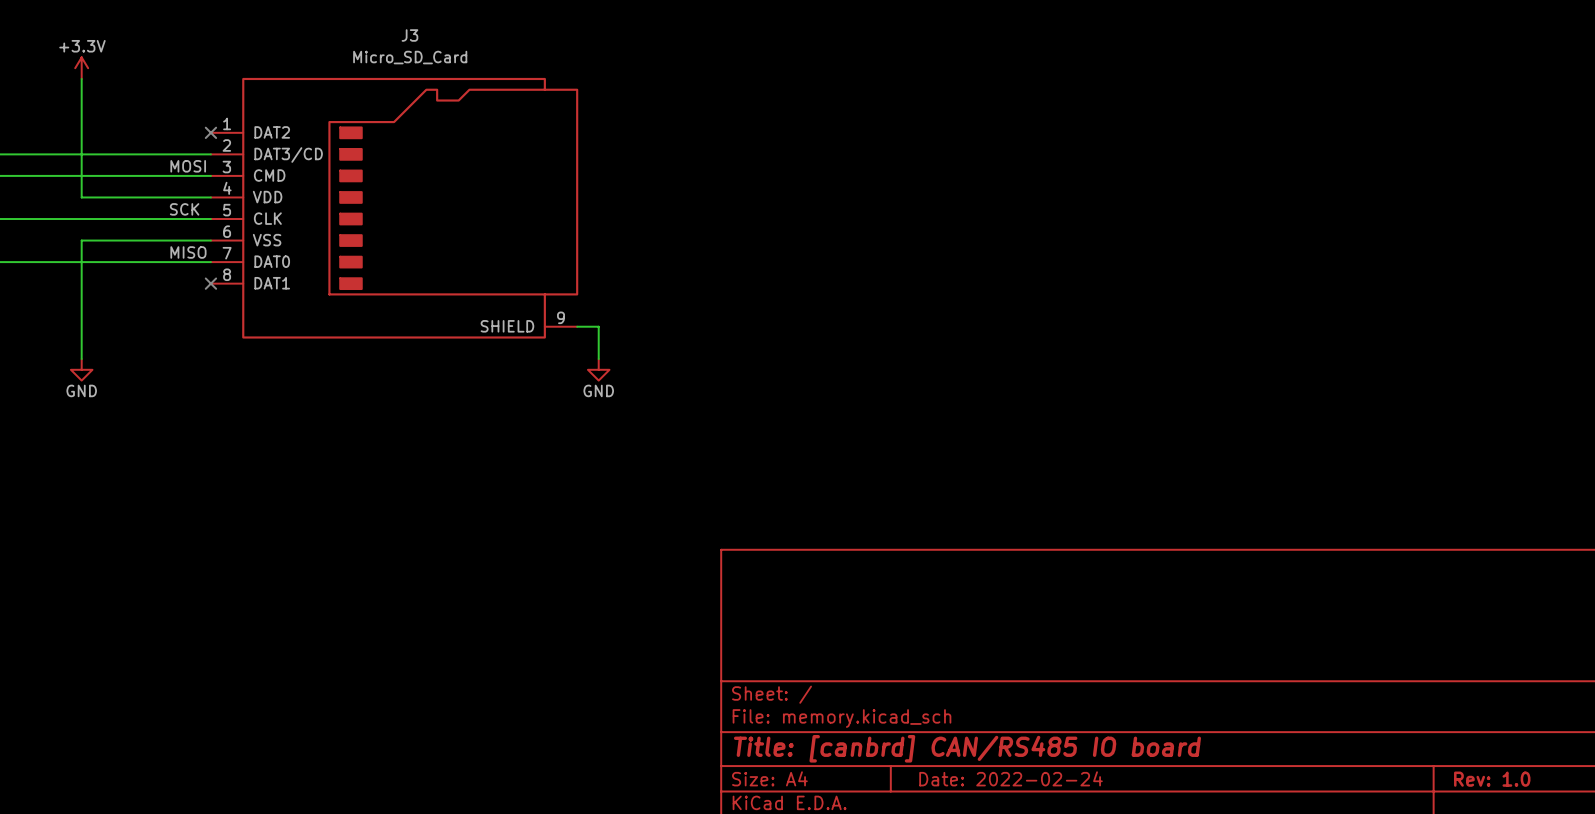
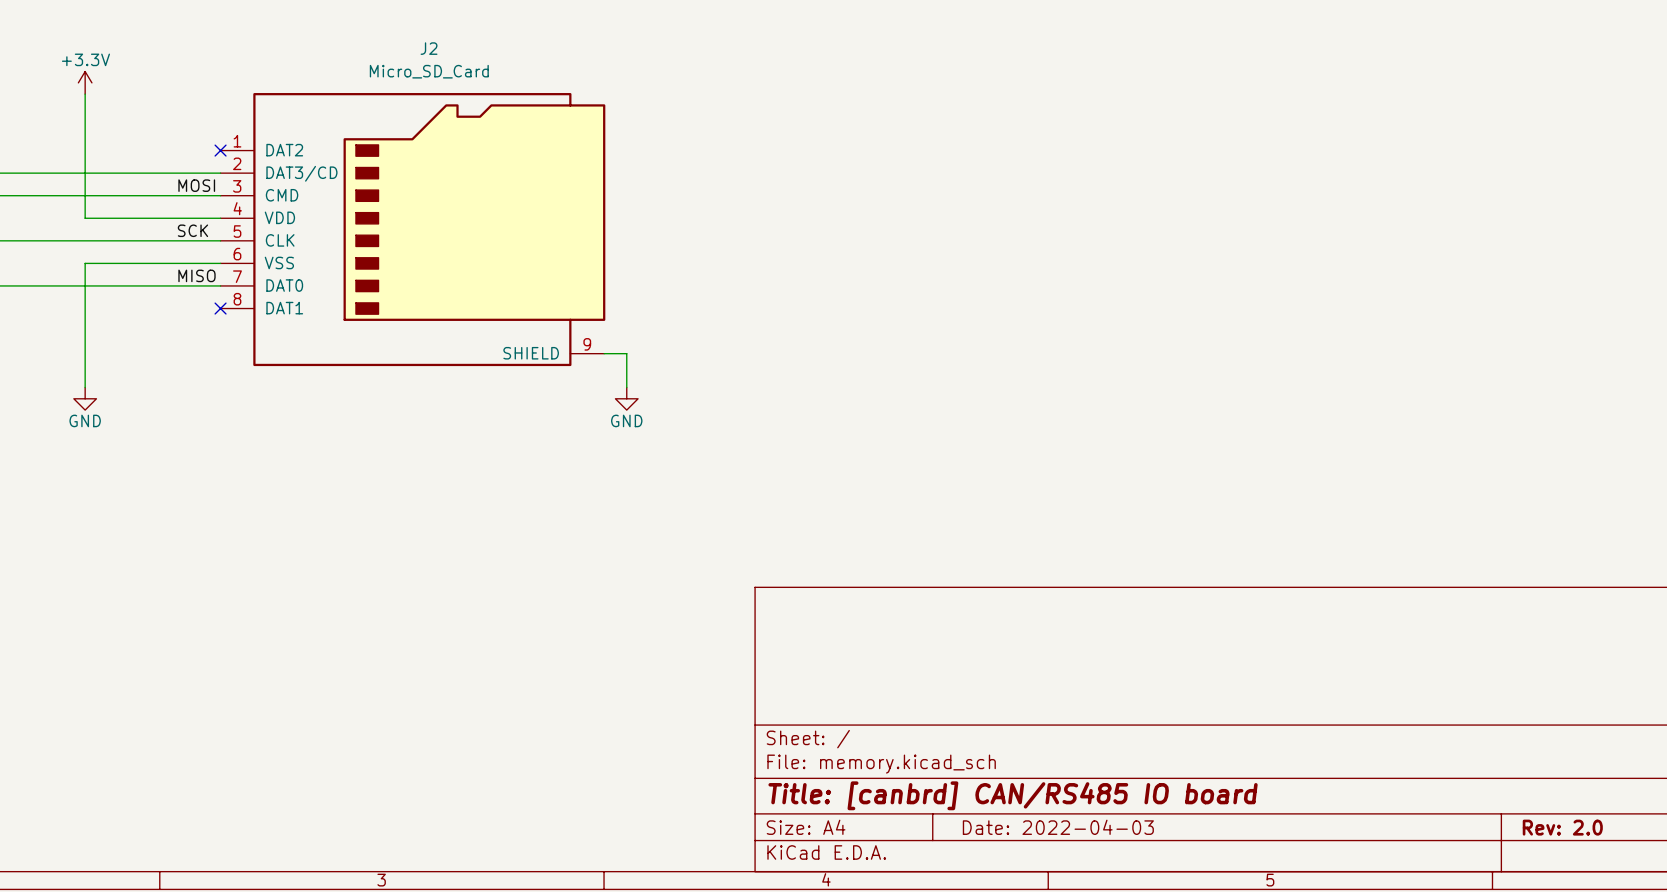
J3 name: J3 (409, 35) -> J2 (429, 48)
title block: Date: 2022-02-24 (1011, 778) -> Date: 2022-04-03 (1058, 827)
title block: Rev: 1.0 (1492, 779) -> Rev: 2.0 (1562, 827)

